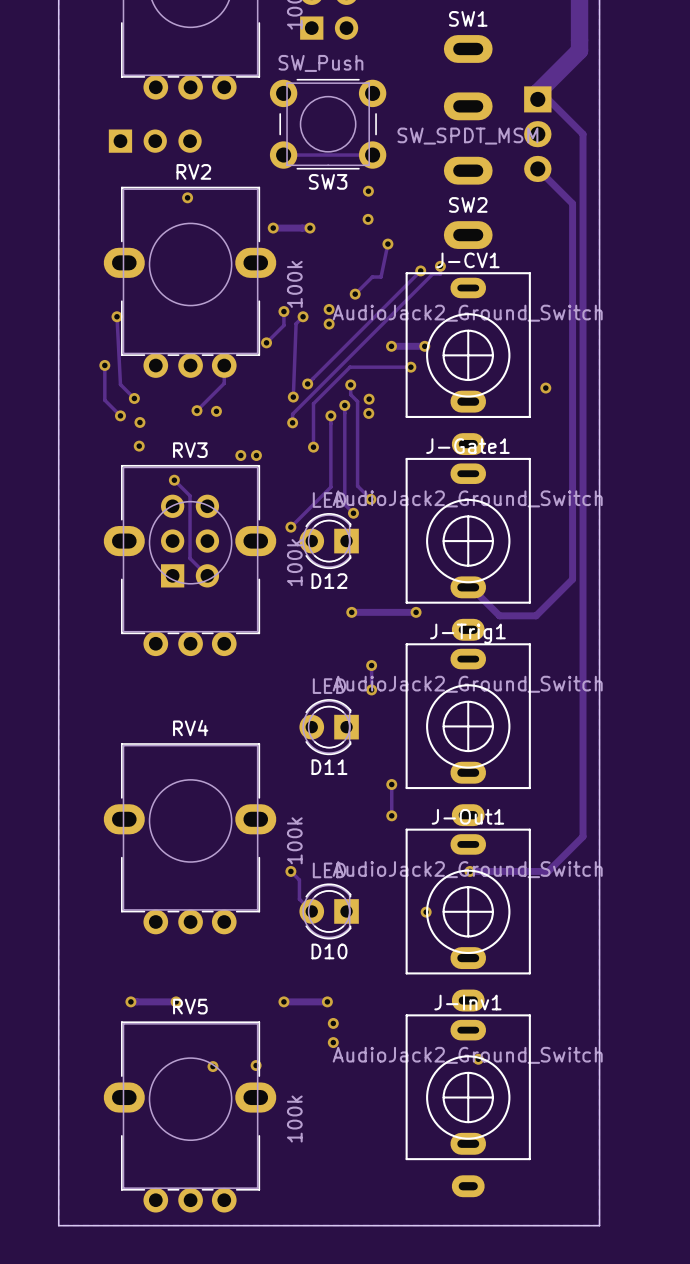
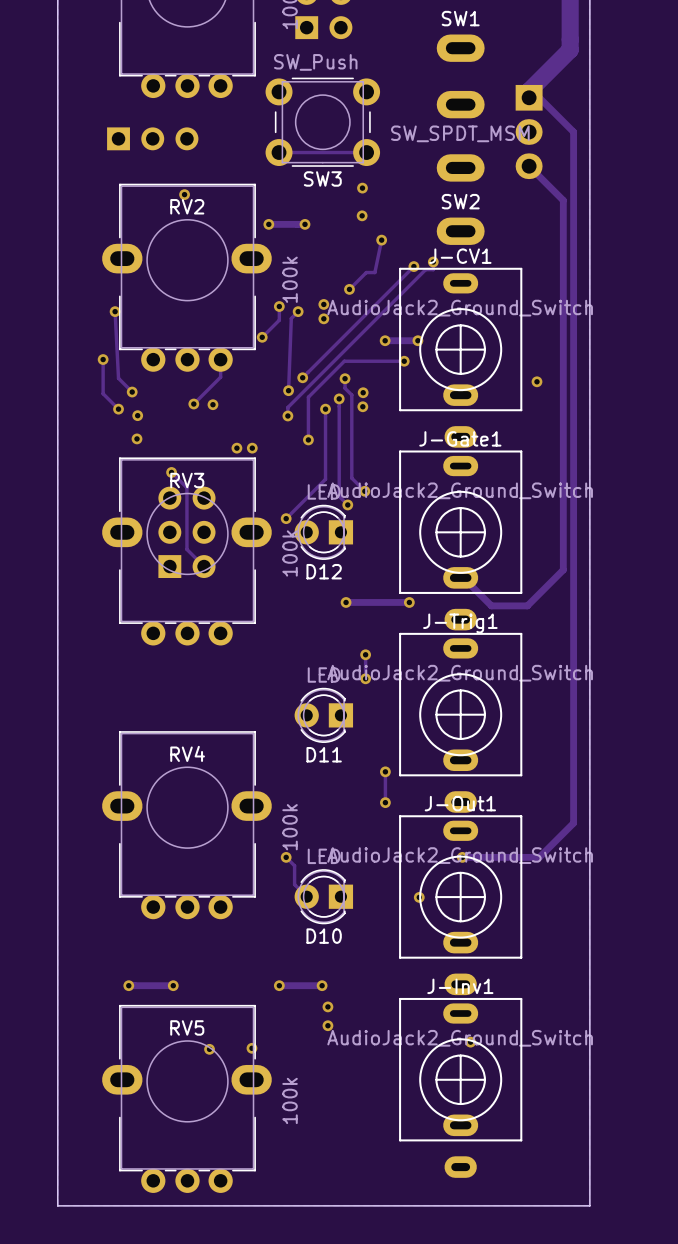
RV2 name position: RV2 (193, 171) -> RV2 (187, 206)
RV3 name position: RV3 (190, 450) -> RV3 (187, 480)
RV4 name position: RV4 (190, 728) -> RV4 (187, 753)
RV5 name position: RV5 (190, 1006) -> RV5 (187, 1027)

